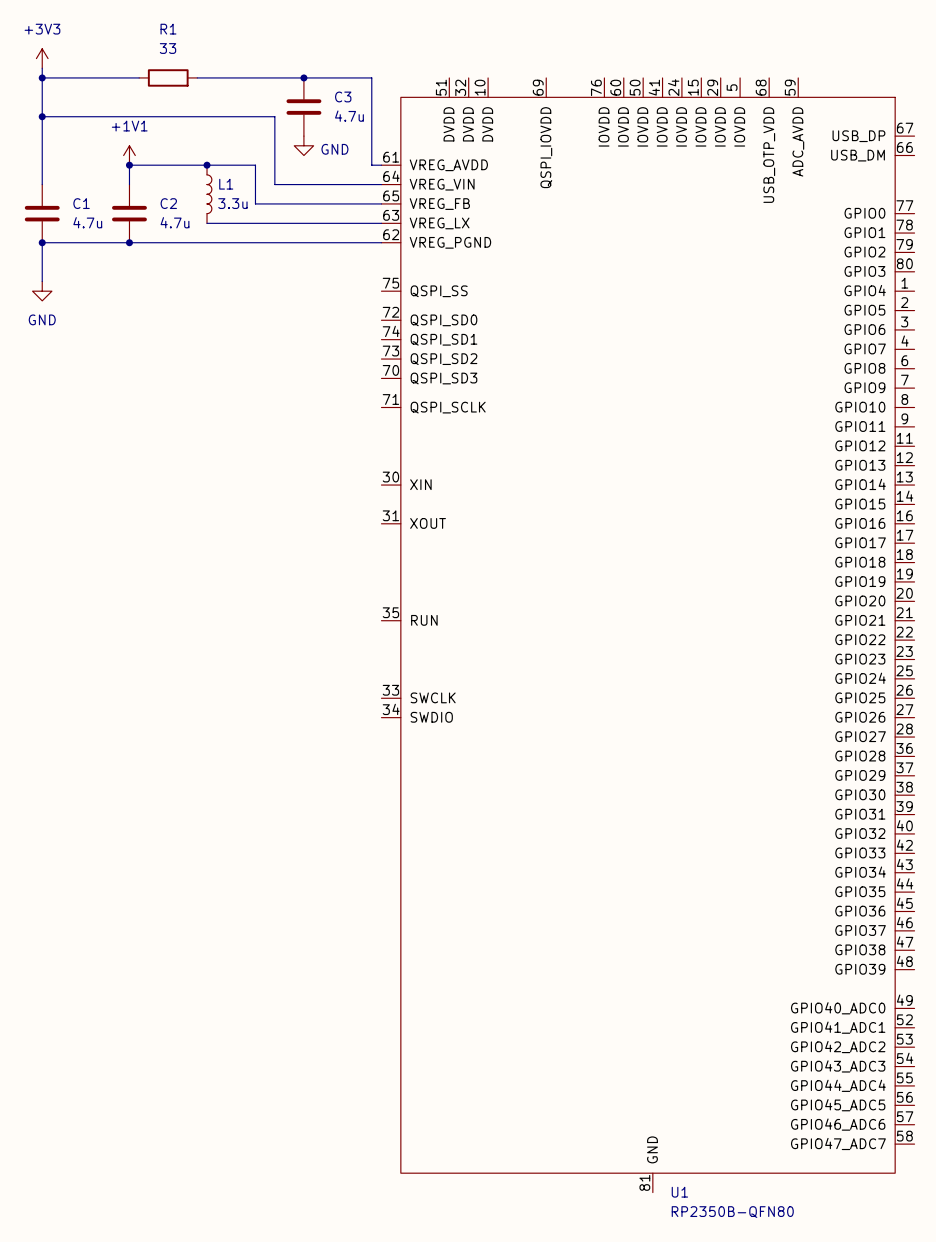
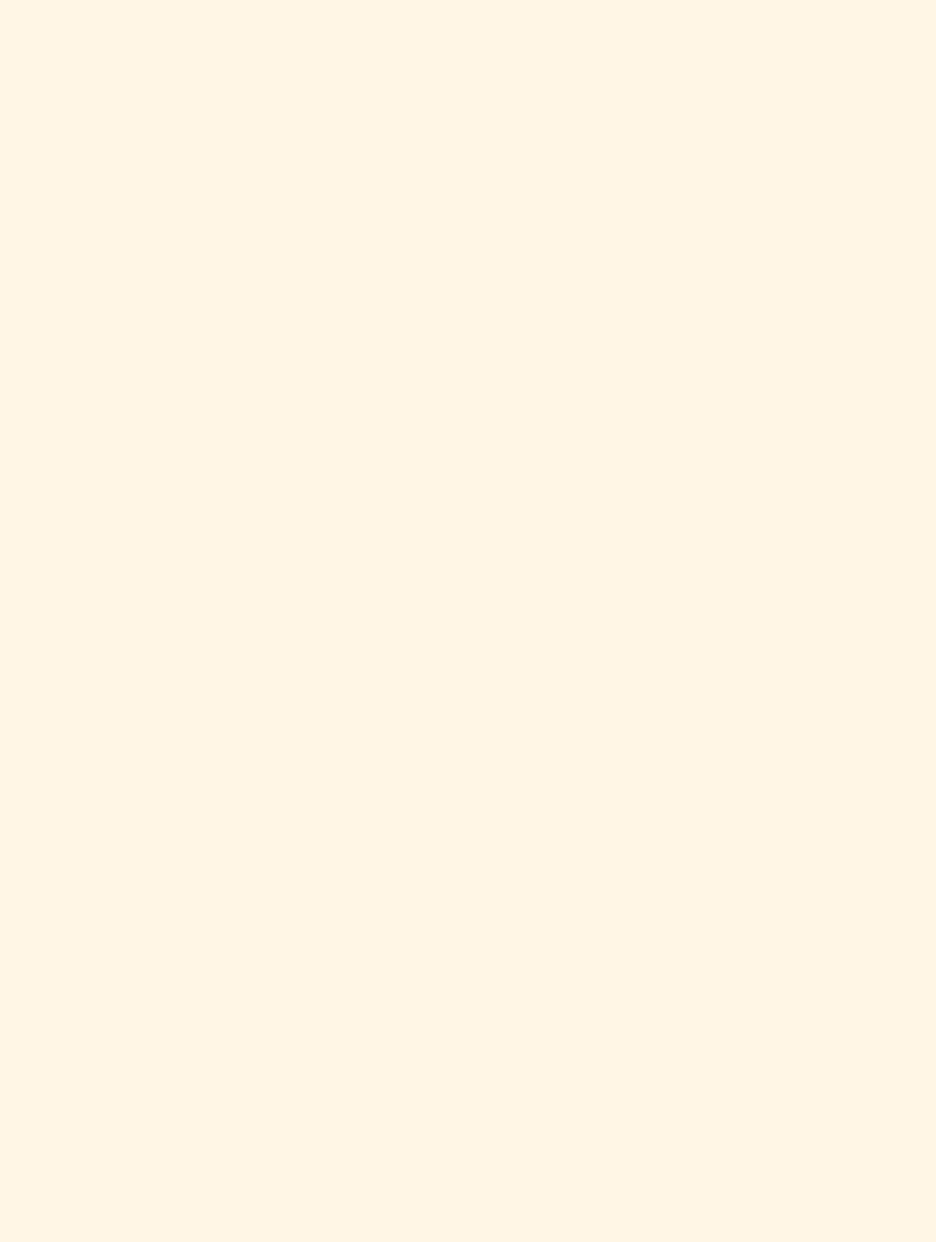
power symbol: +3V3 (42, 58) -> none
wire: (42, 68) (42, 184) -> none
wire: (42, 77) (139, 77) -> none
junction: (42, 77) -> none
R1: 33 (168, 77) -> none
wire: (197, 77) (371, 77) (371, 165) (381, 165) -> none
junction: (303, 77) -> none
C3: 4.7u (303, 107) -> none
wire: (42, 116) (274, 116) (274, 184) (381, 184) -> none
junction: (42, 116) -> none
power symbol: GND (303, 145) -> none
power symbol: +1V1 (129, 155) -> none
junction: (129, 165) -> none
junction: (207, 165) -> none
wire: (129, 184) (129, 165) (255, 165) (255, 203) (381, 203) -> none
L1: 3.3u (209, 194) -> none
C1: 4.7u (42, 213) -> none
C2: 4.7u (129, 213) -> none
wire: (207, 223) (381, 223) -> none
junction: (42, 242) -> none
junction: (129, 242) -> none
wire: (381, 242) (42, 242) (42, 281) -> none
power symbol: GND (42, 291) -> none
U1: RP2350B-QFN80 (648, 635) -> none

